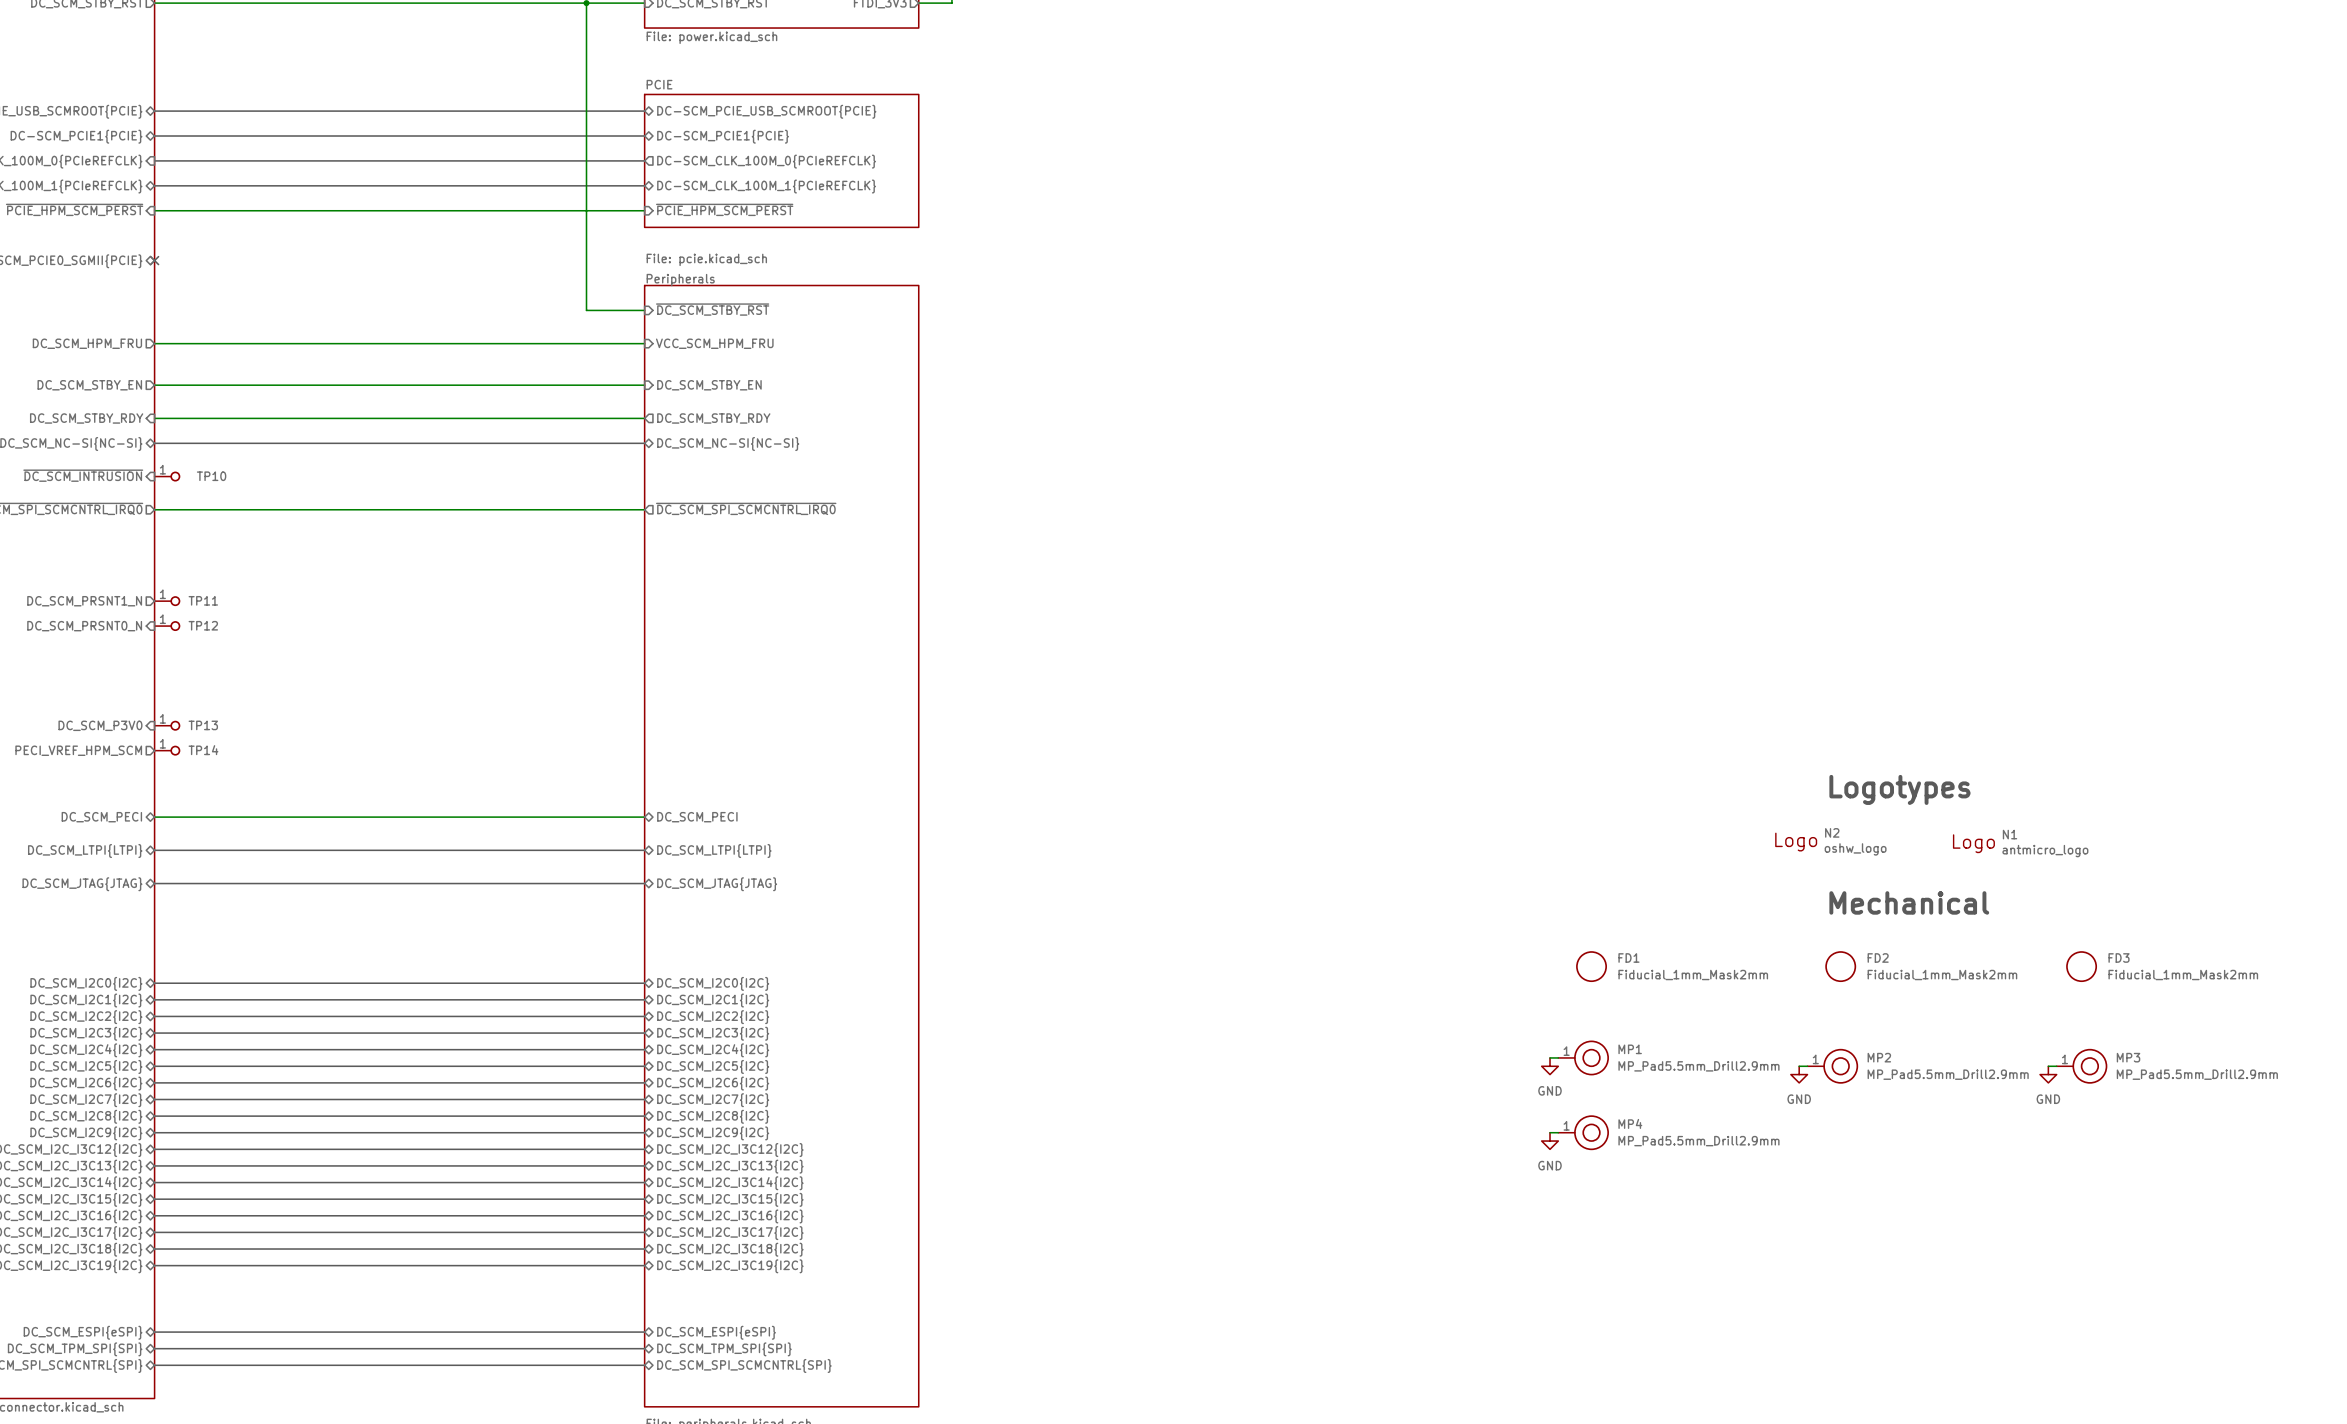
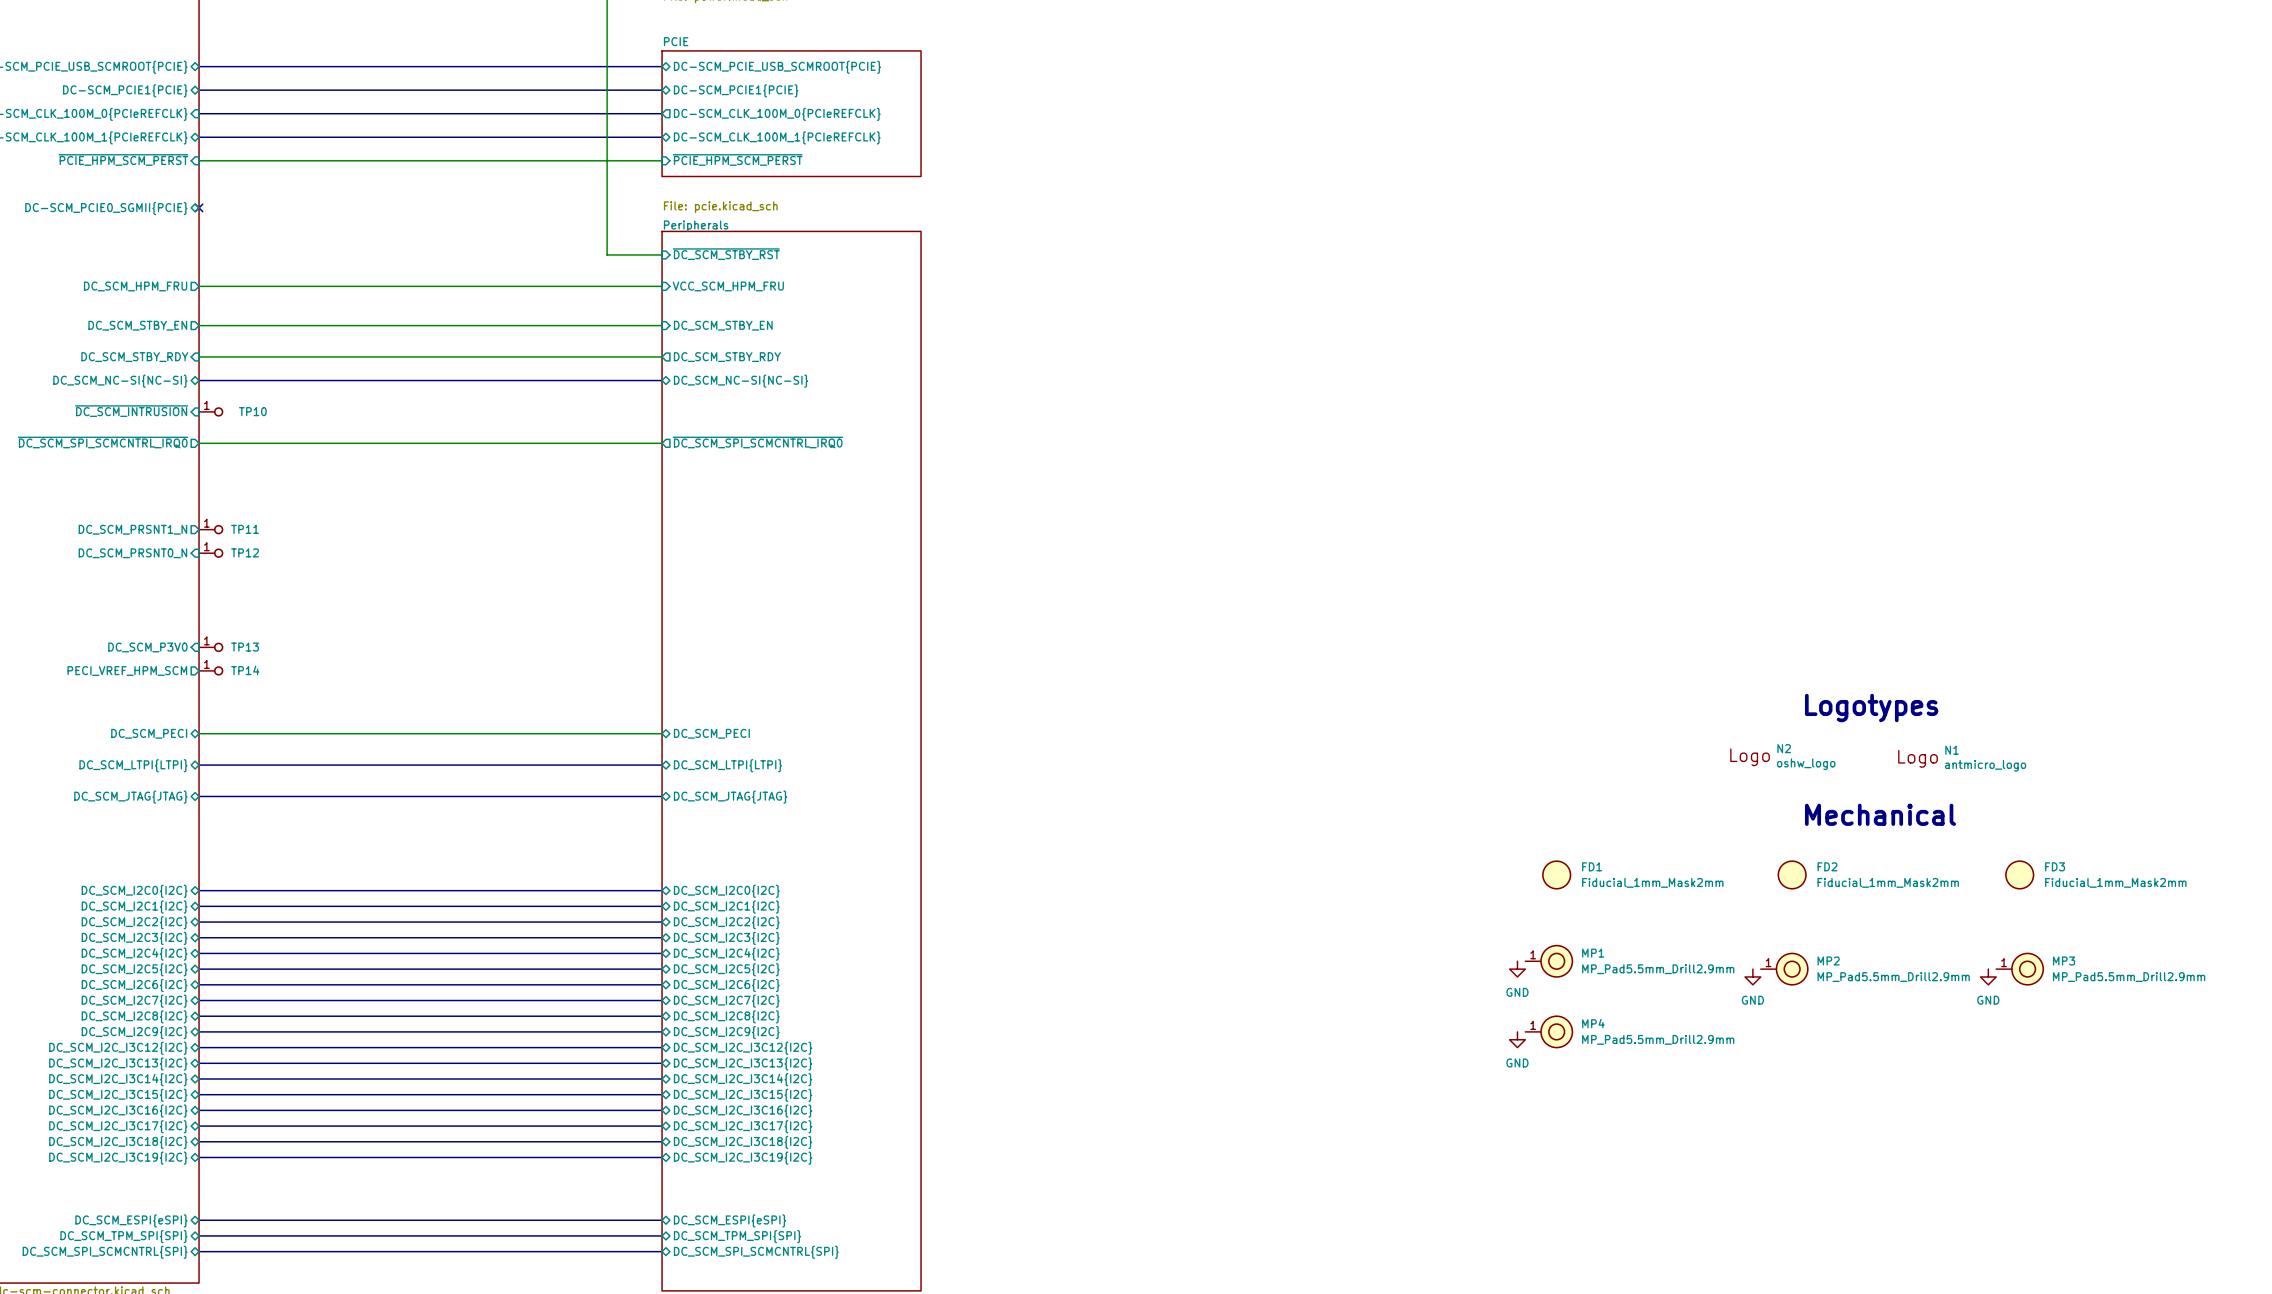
text position: Logotypes (1899, 789) -> Logotypes (1871, 708)
text position: Mechanical (1909, 902) -> Mechanical (1880, 814)
wire: (1550, 1057) (1558, 1057) -> none
wire: (1799, 1066) (1807, 1066) -> none
wire: (2048, 1066) (2056, 1066) -> none
wire: (1550, 1132) (1558, 1132) -> none

